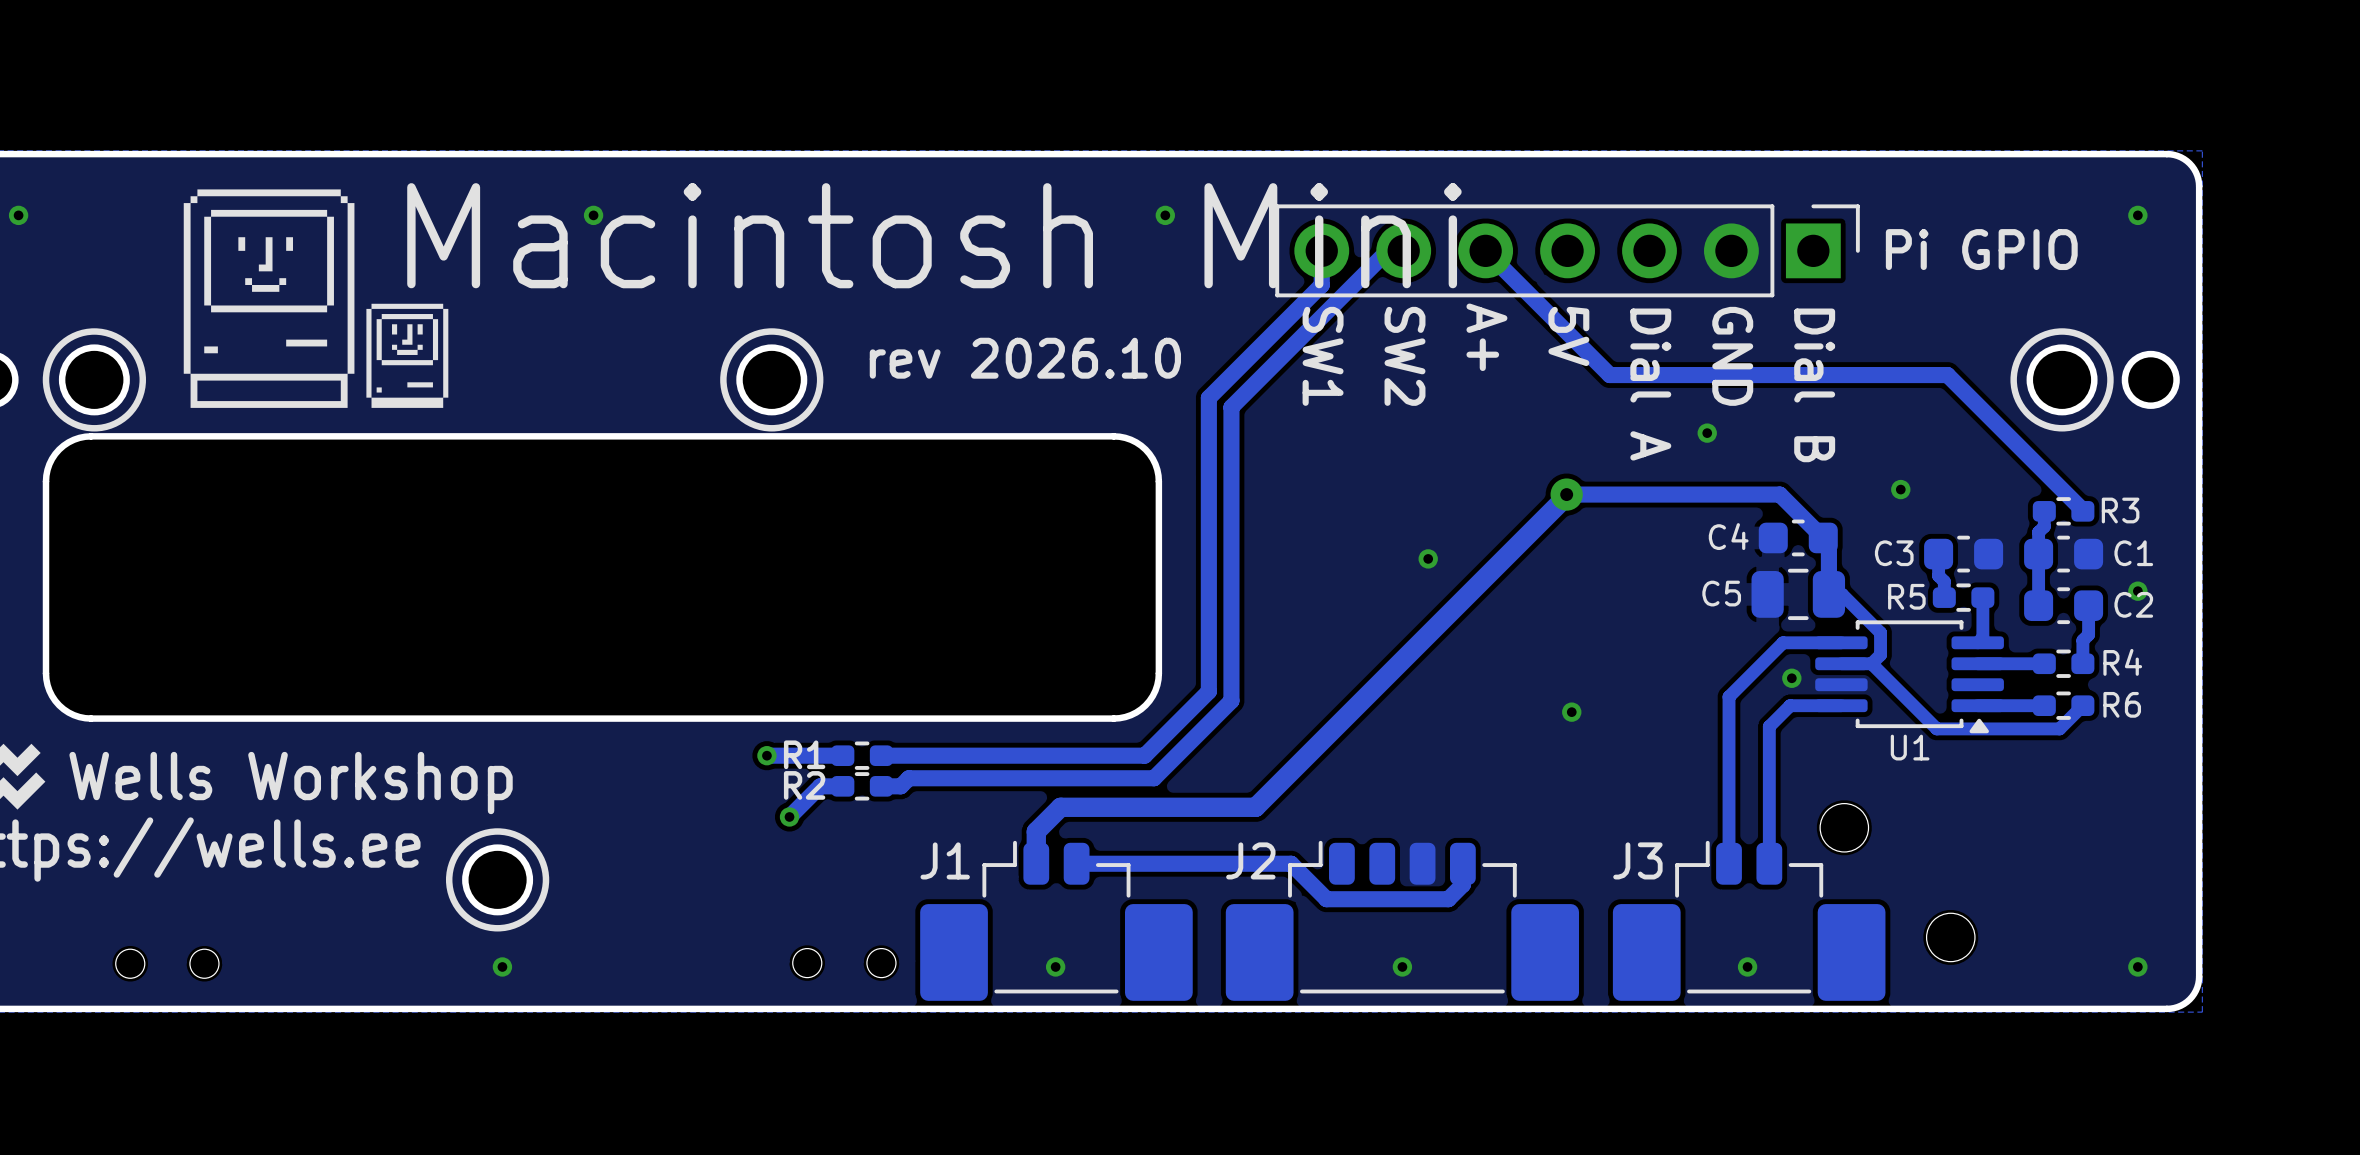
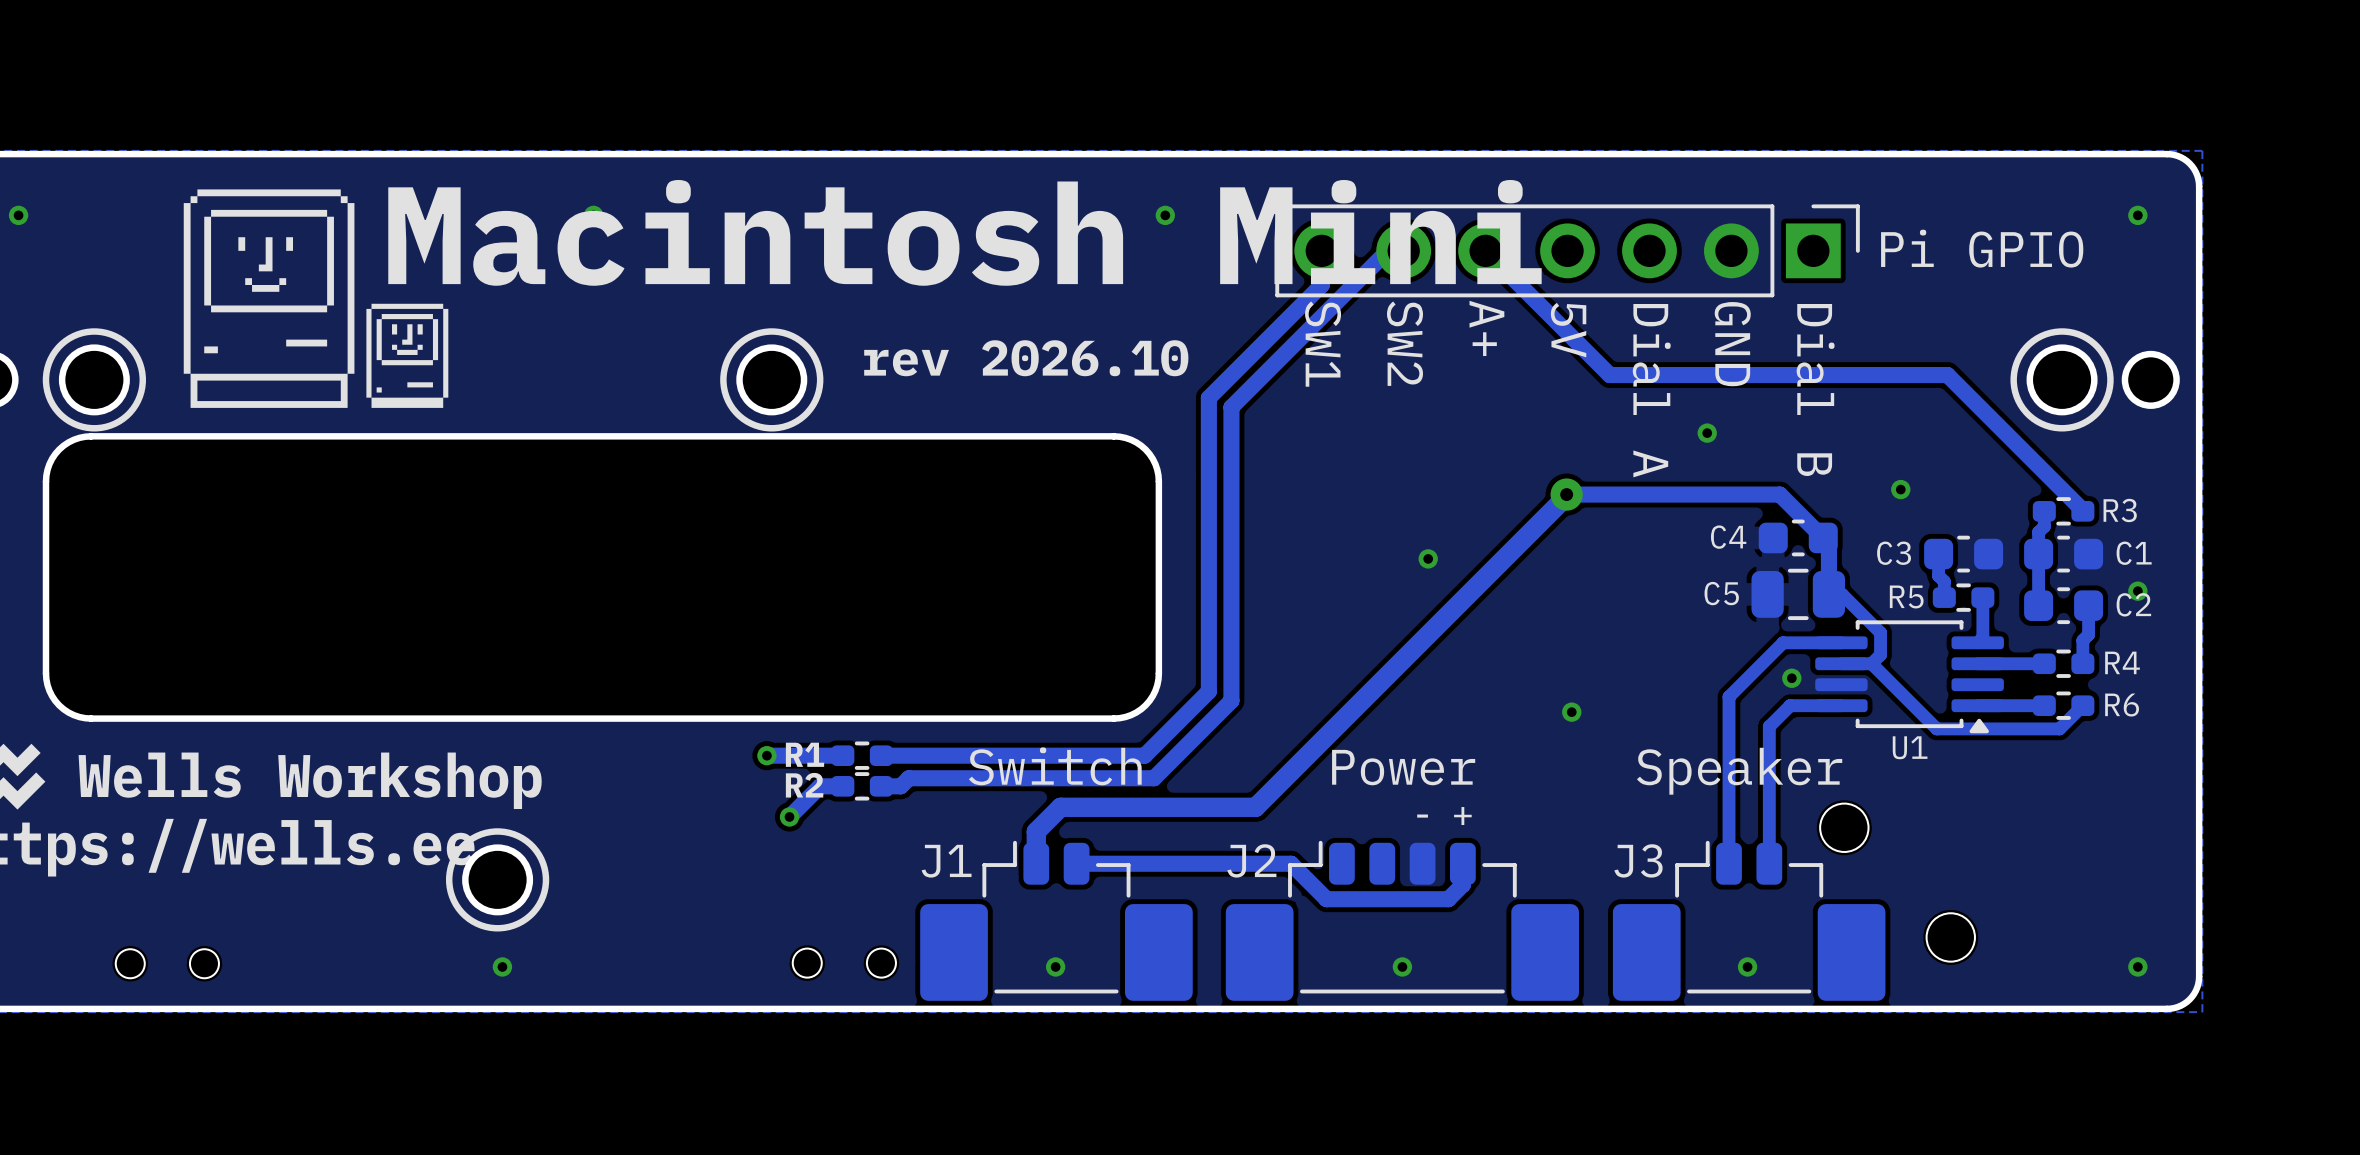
J1 text: none -> Switch (1055, 766)
J2 text: none -> Power (1403, 767)
J3 text: none -> Speaker (1739, 771)
text: none -> - (1422, 816)
text: none -> + (1462, 816)

